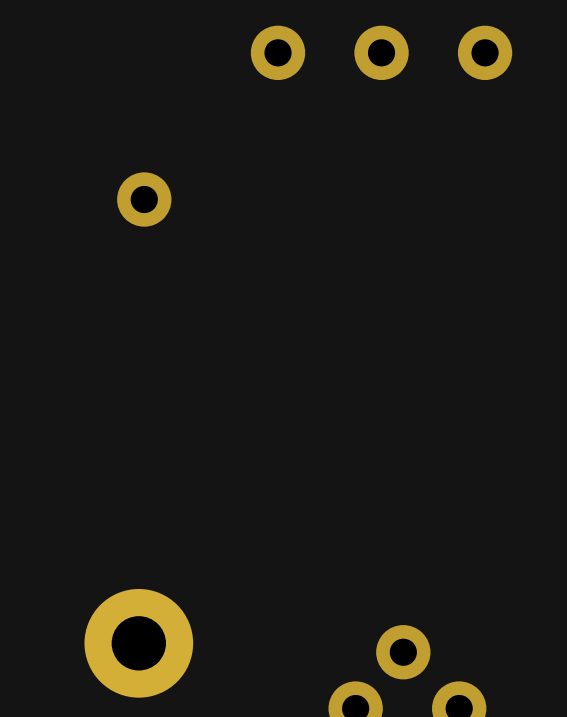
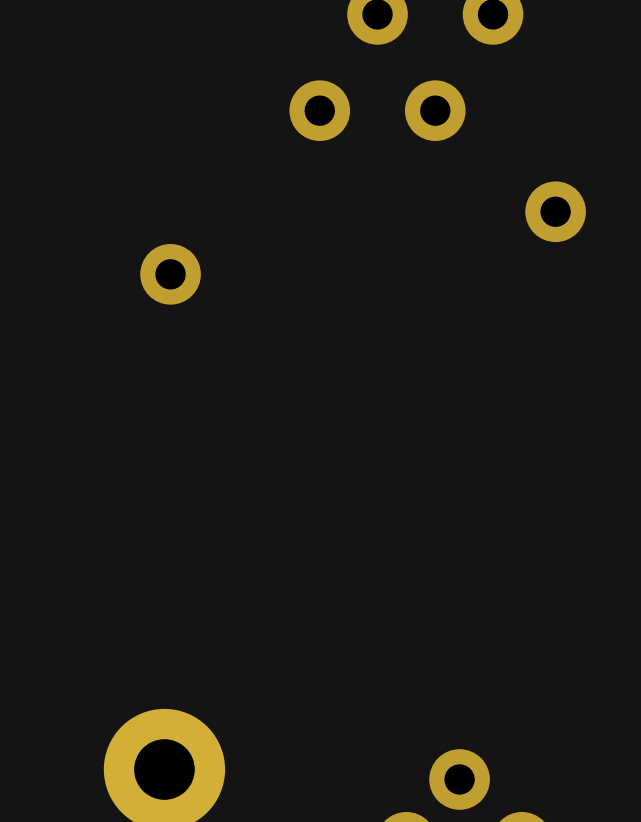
via: (485, 52) -> none
via: none -> (555, 211)

